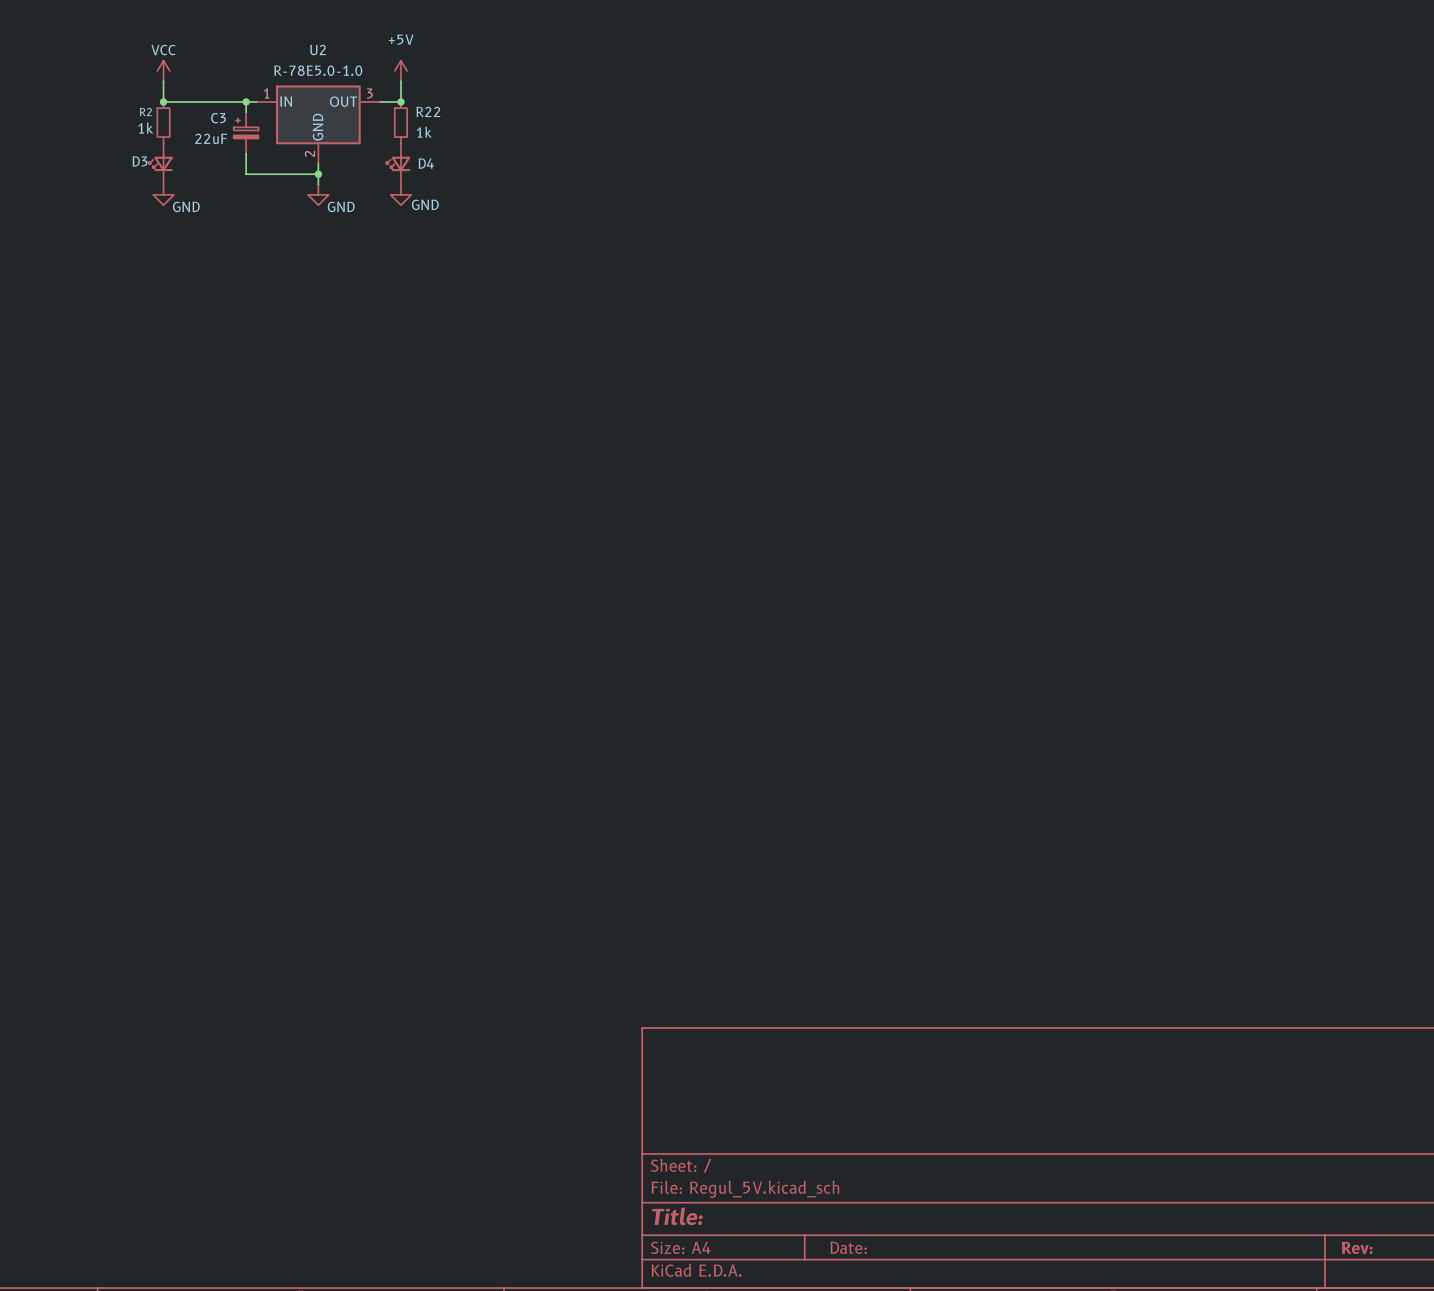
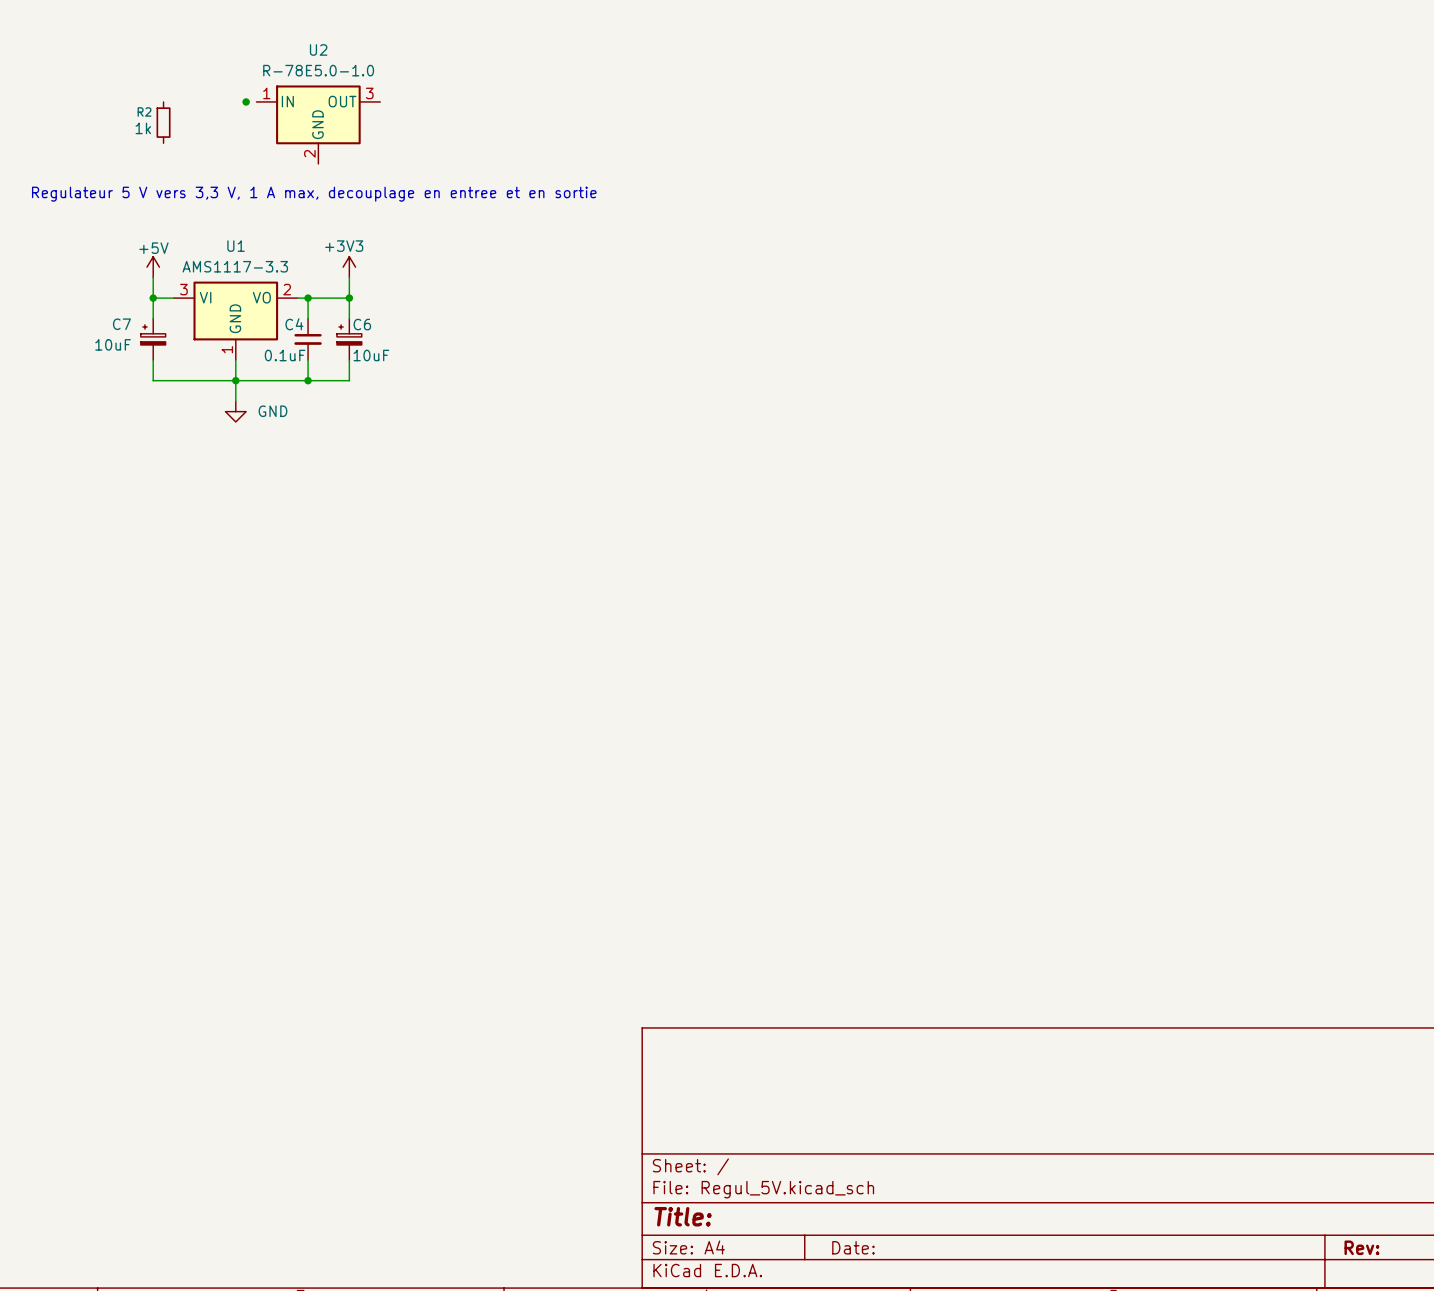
power symbol: VCC (163, 71) -> none
power symbol: +5V (400, 71) -> none
wire: (163, 81) (163, 101) (256, 101) -> none
wire: (400, 81) (400, 101) (380, 101) -> none
junction: (163, 101) -> none
wire: (246, 101) (246, 112) -> none
junction: (400, 101) -> none
R22: 1k (400, 122) -> none
C3: 22uF (246, 132) -> none
wire: (246, 153) (246, 174) (318, 174) -> none
D3: (160, 163) -> none
wire: (318, 163) (318, 184) -> (308, 298) (308, 318)
D4: (398, 163) -> none
junction: (318, 174) -> none
text: none -> Regulateur 5 V vers 3,3 V, 1 A max, decouplage en entree et en sortie (314, 194)
power symbol: GND (163, 194) -> none
power symbol: GND (318, 194) -> none
power symbol: GND (400, 194) -> none
power symbol: none -> +5V (153, 267)
power symbol: none -> +3V3 (349, 267)
wire: none -> (153, 277) (153, 318)
wire: none -> (349, 277) (349, 318)
wire: none -> (153, 298) (173, 298)
junction: none -> (153, 298)
wire: none -> (297, 298) (349, 298)
junction: none -> (308, 298)
junction: none -> (349, 298)
U1: none -> AMS1117-3.3 (235, 320)
C7: none -> 10uF (153, 339)
C4: none -> 0.1uF (308, 339)
C6: none -> 10uF (349, 339)
wire: none -> (153, 360) (153, 380) (349, 380) (349, 360)
wire: none -> (235, 360) (235, 401)
wire: none -> (308, 360) (308, 380)
junction: none -> (235, 380)
junction: none -> (308, 380)
power symbol: none -> GND (235, 411)

